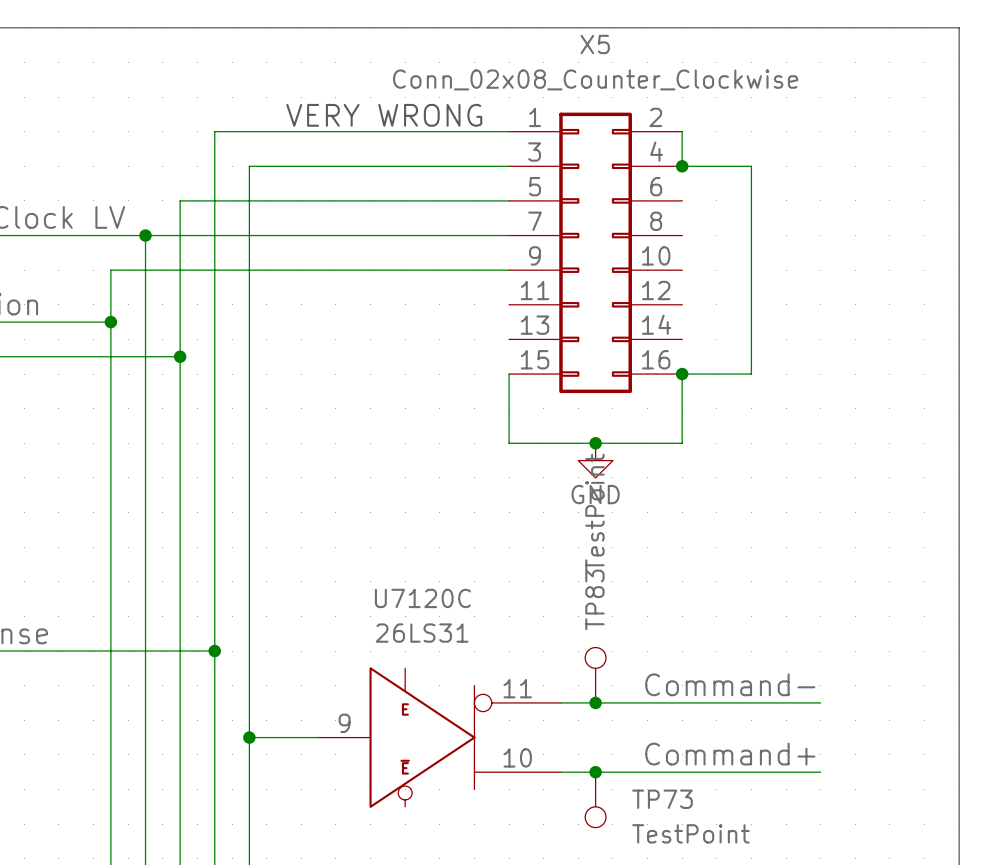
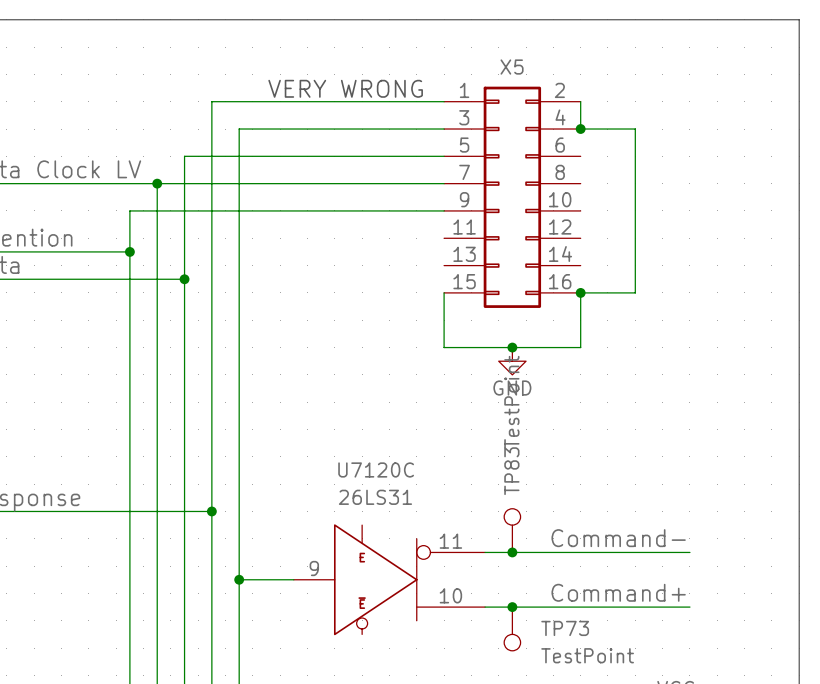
X5 name position: X5 (595, 44) -> X5 (512, 67)
X5 value: Conn_02x08_Counter_Clockwise (595, 79) -> none

